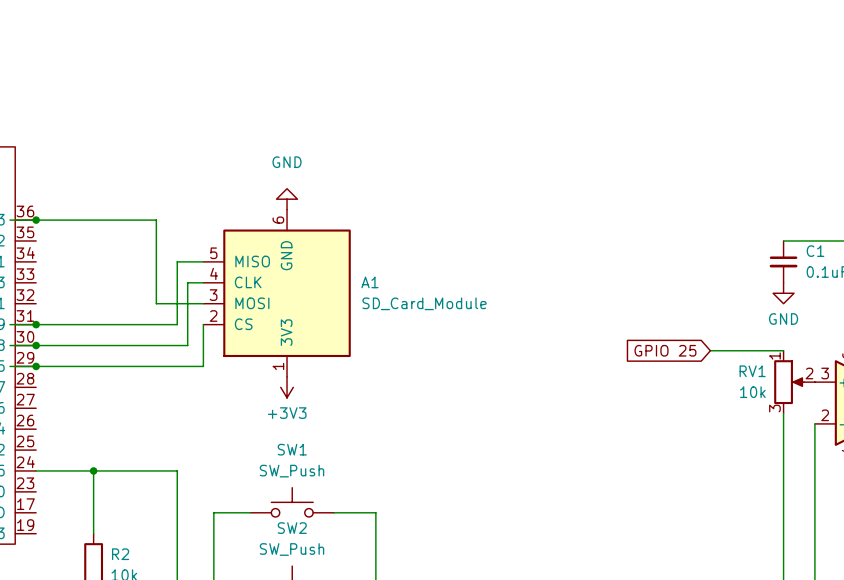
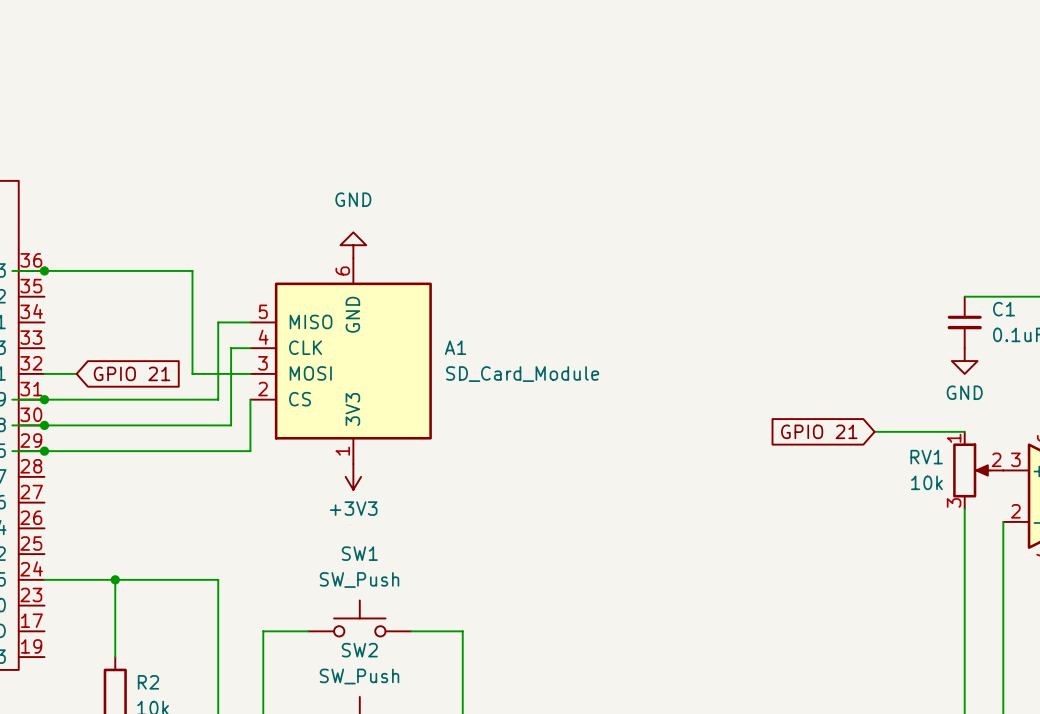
wire: none -> (44, 373) (76, 373)
global label: none -> GPIO 21 (131, 373)
global label: GPIO 25 (665, 350) -> GPIO 21 (819, 431)

